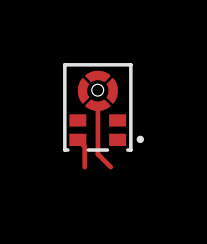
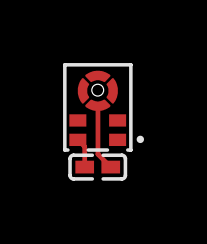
part: none -> (97, 167)

